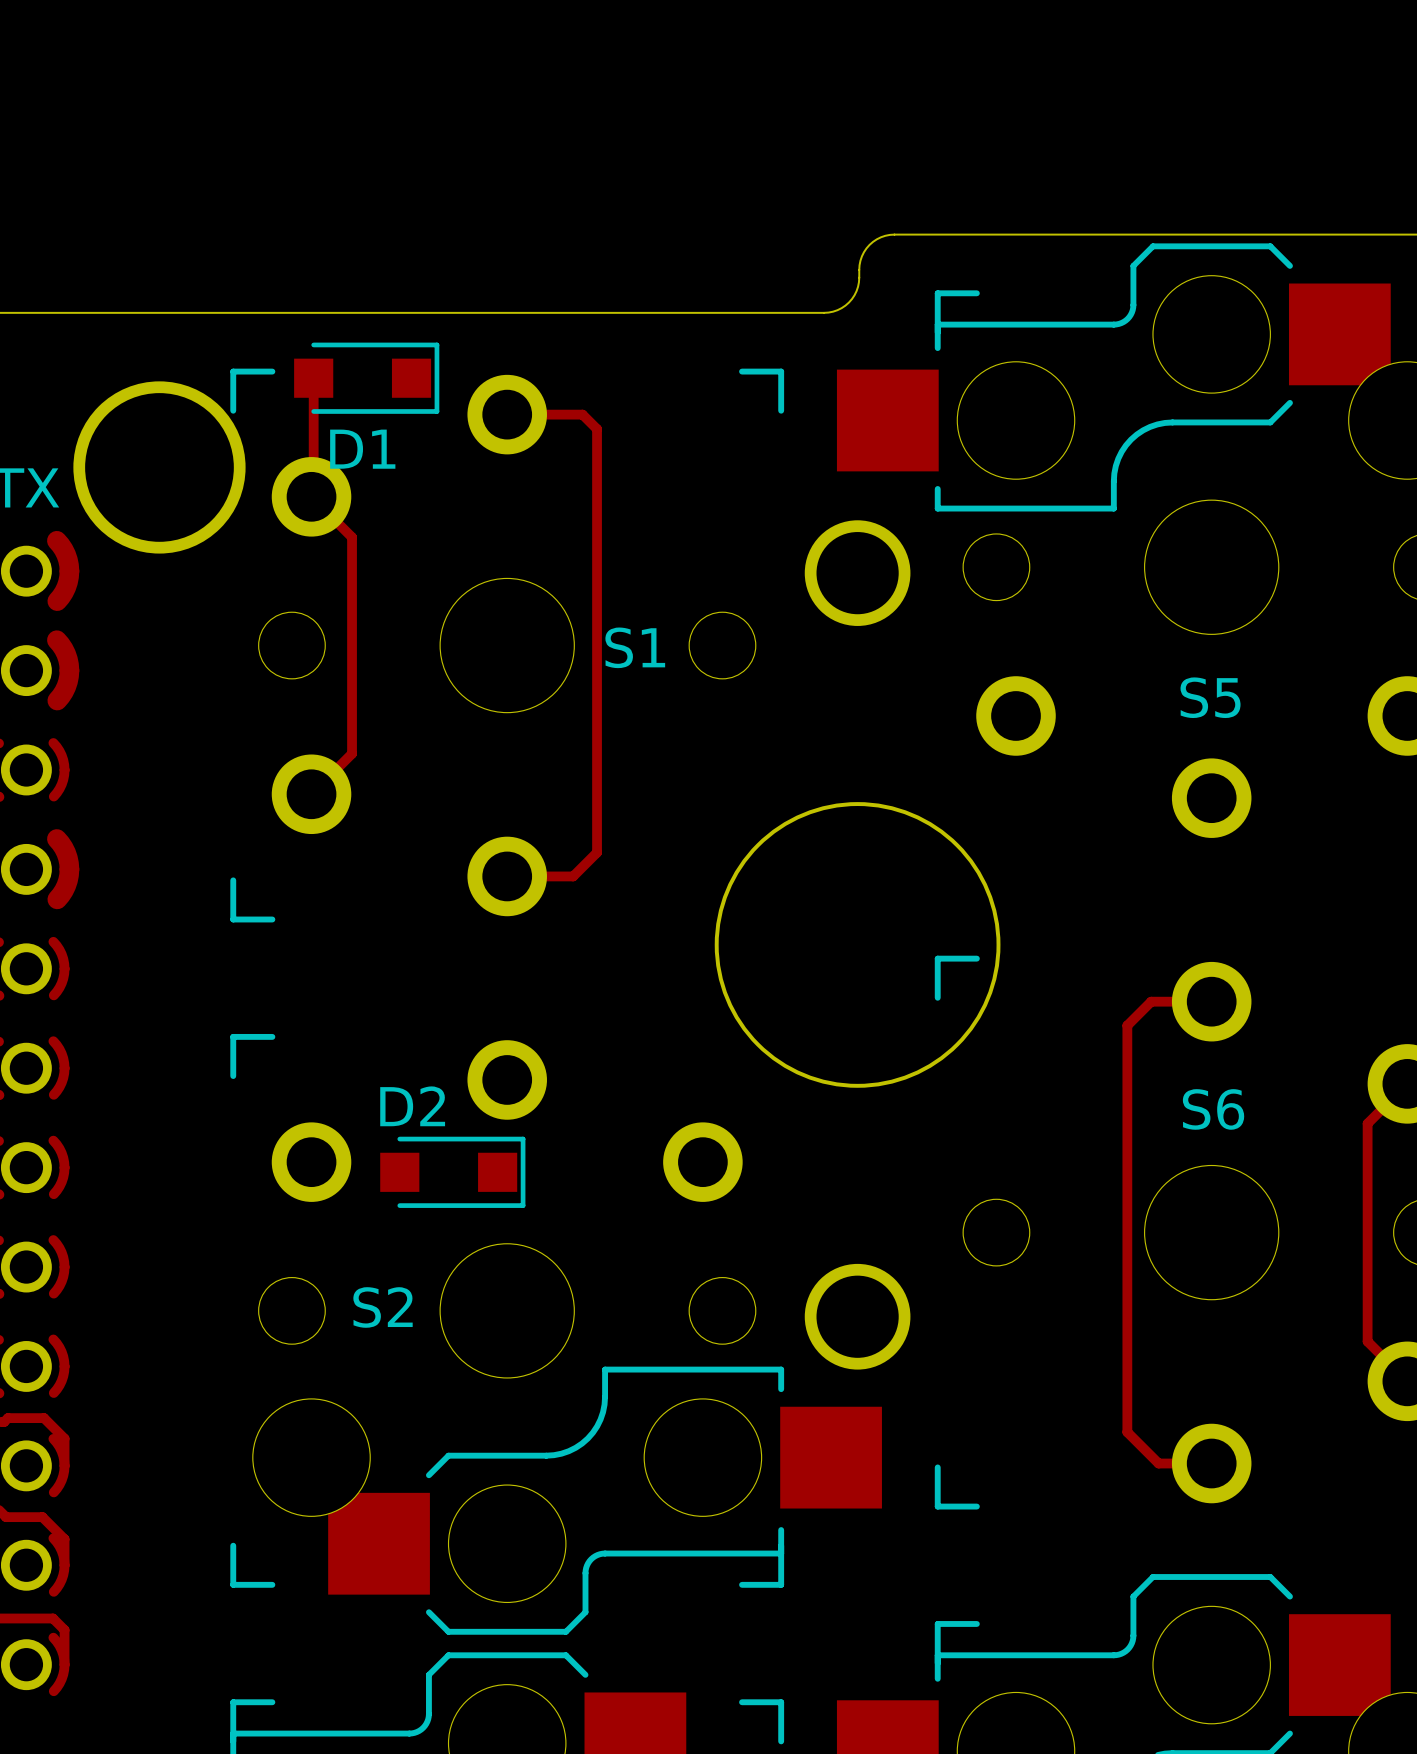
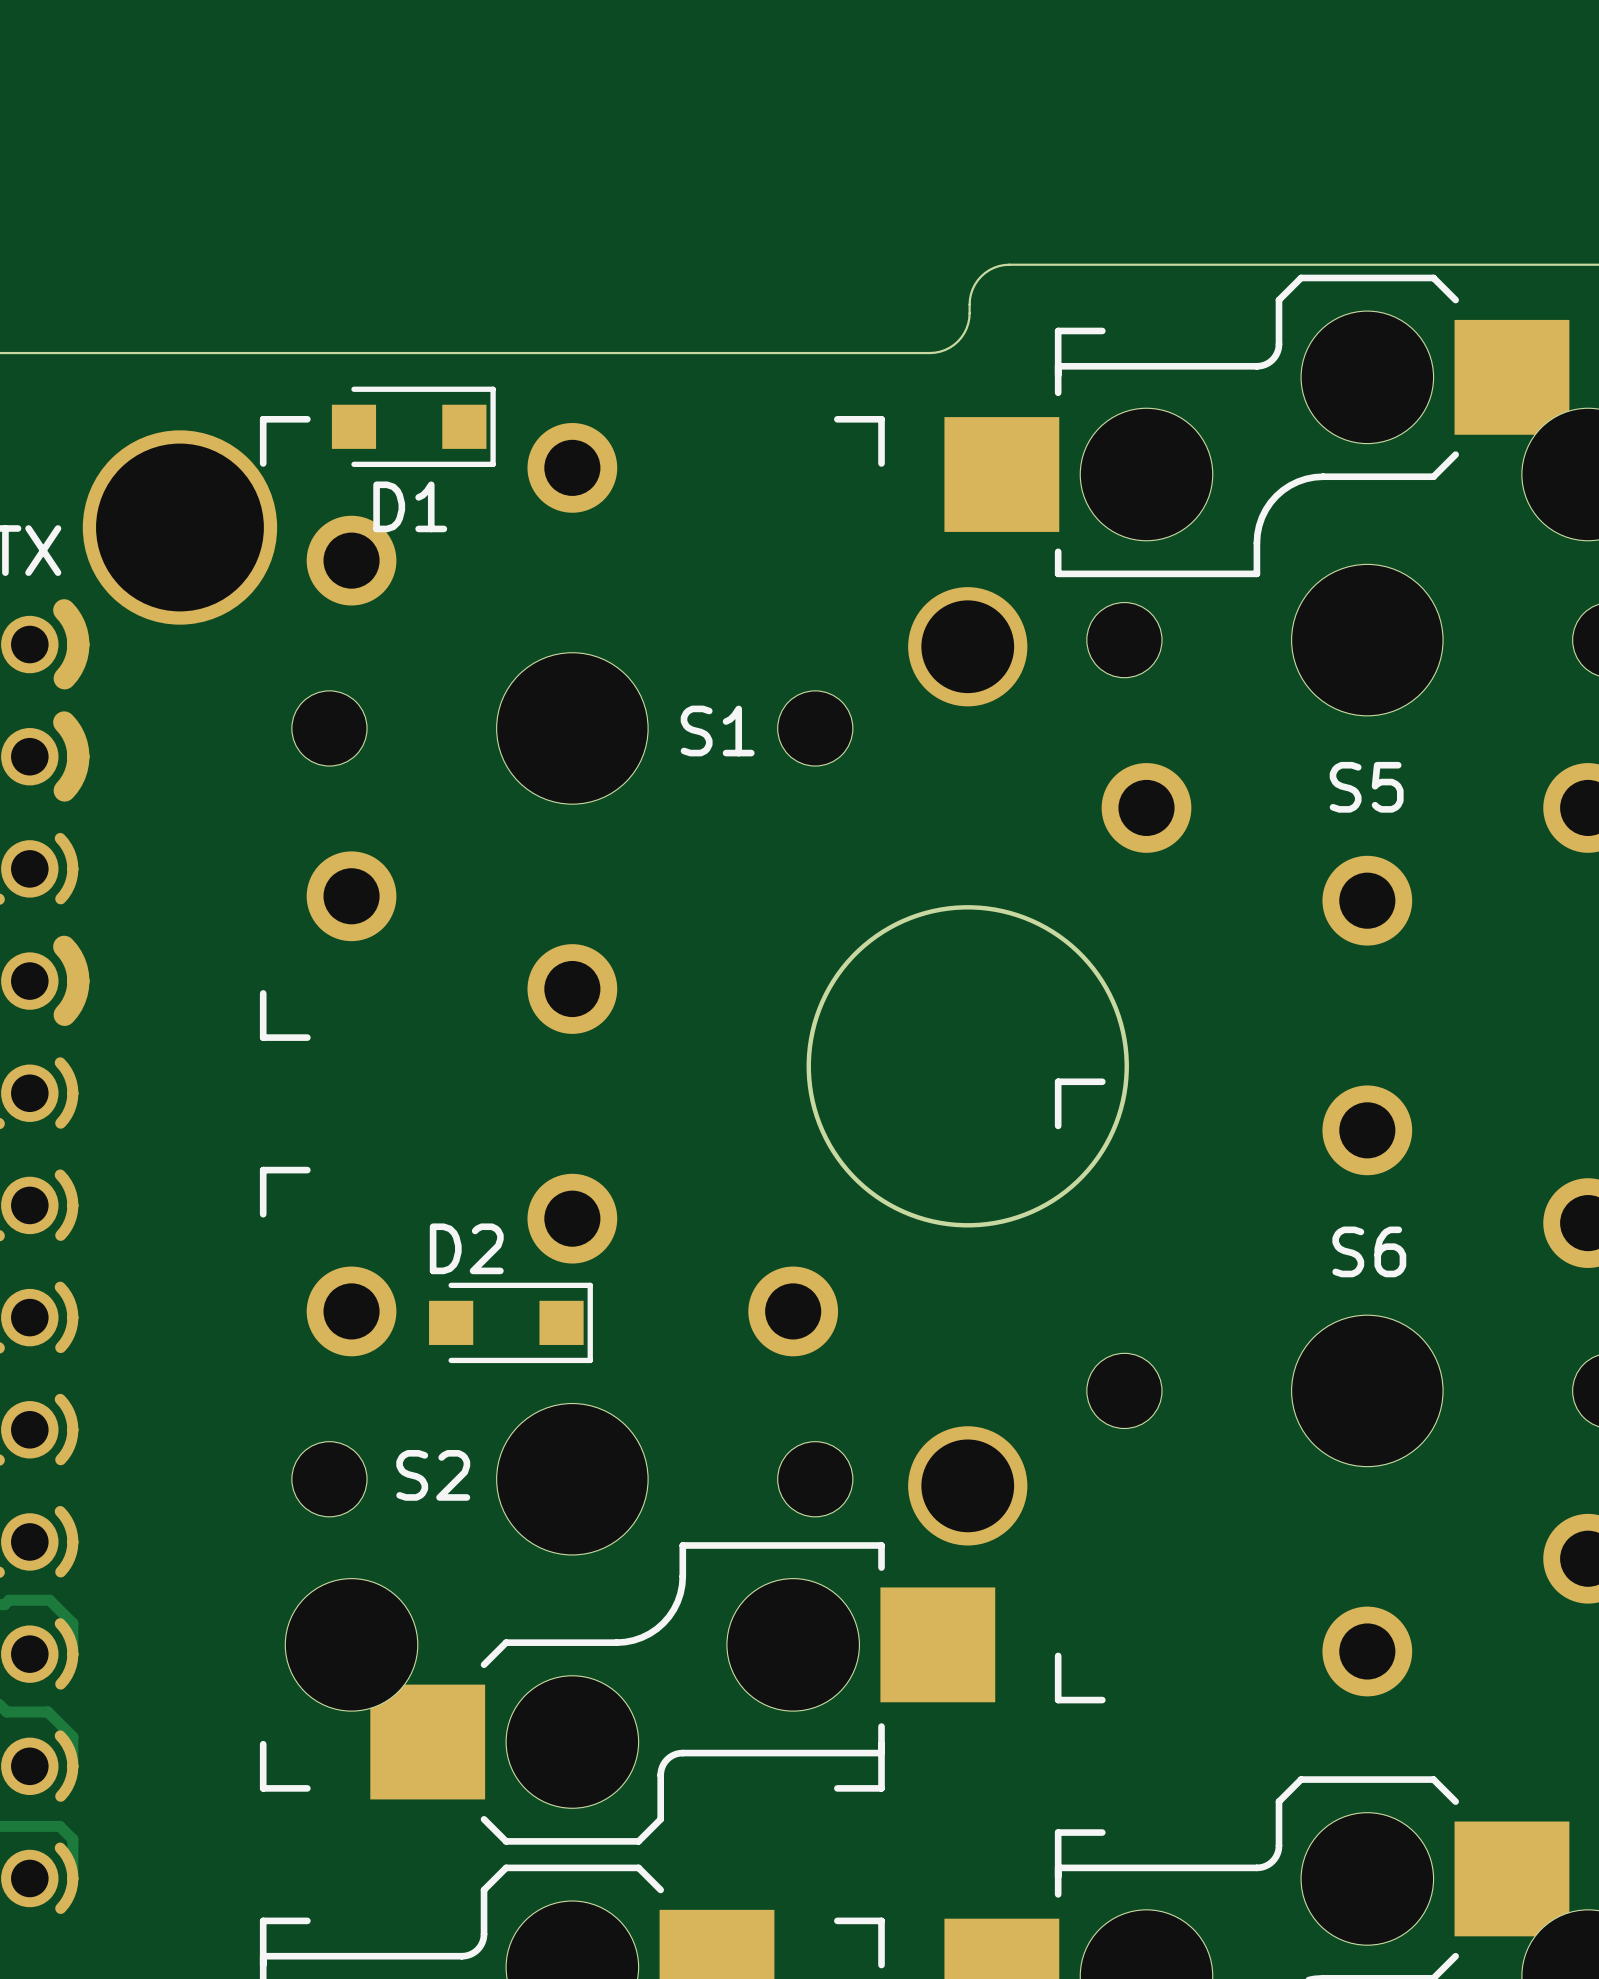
track: (313, 378) (313, 494) (311, 496) (352, 537) (352, 753) (311, 794) -> none
track: (507, 414) (582, 414) (597, 429) (597, 852) (573, 876) (507, 876) -> none
track: (1211, 1001) (1151, 1001) (1127, 1025) (1127, 1432) (1158, 1463) (1211, 1463) -> none
track: (1407, 1083) (1367, 1123) (1367, 1341) (1407, 1381) -> none

